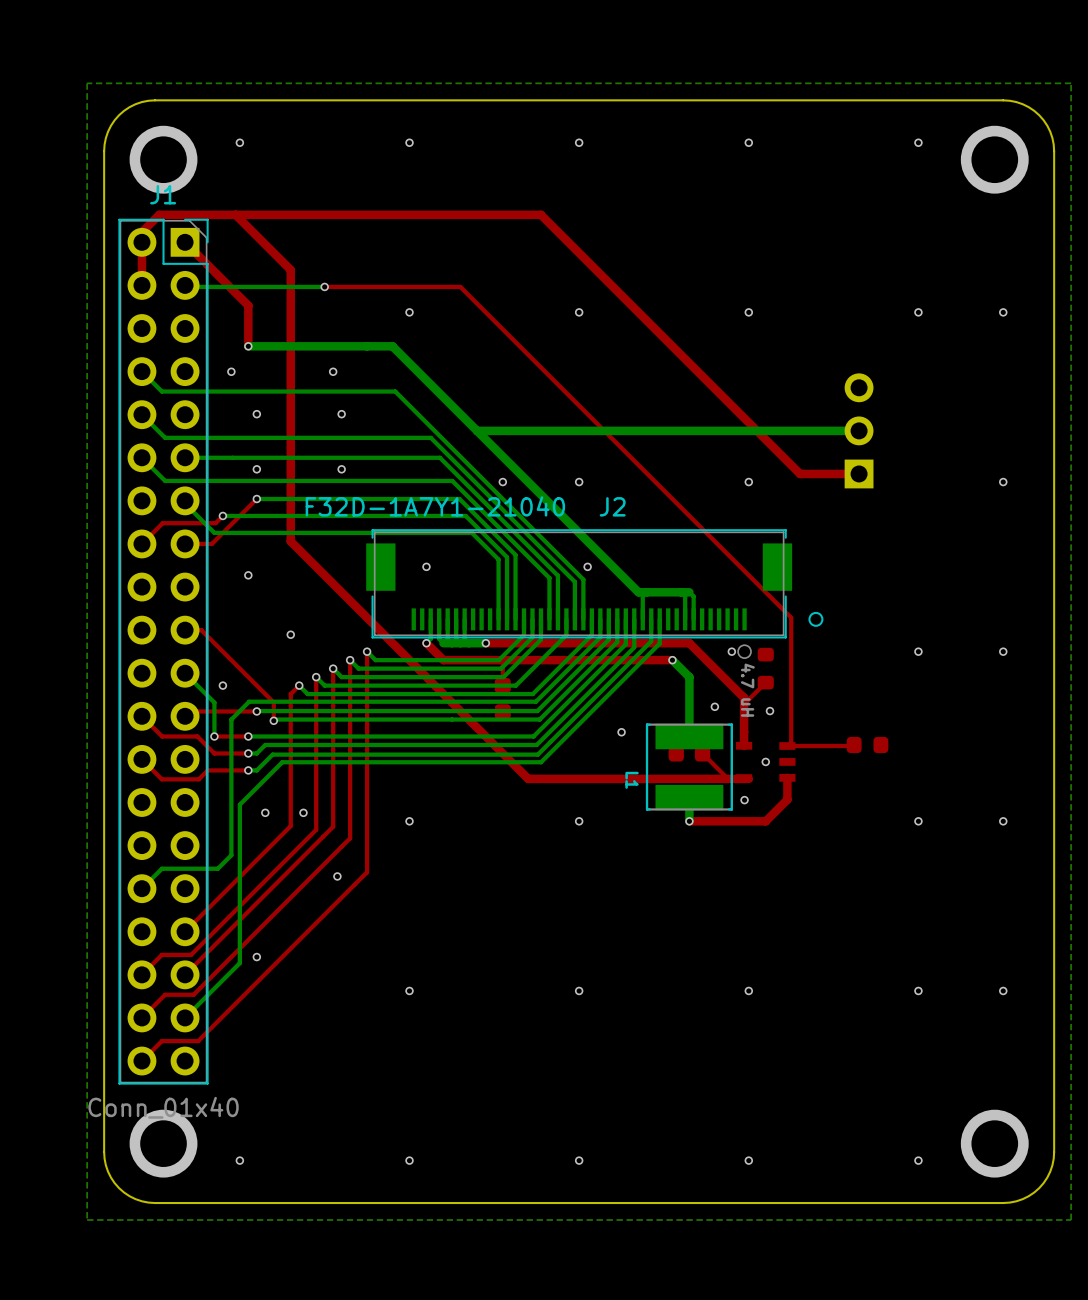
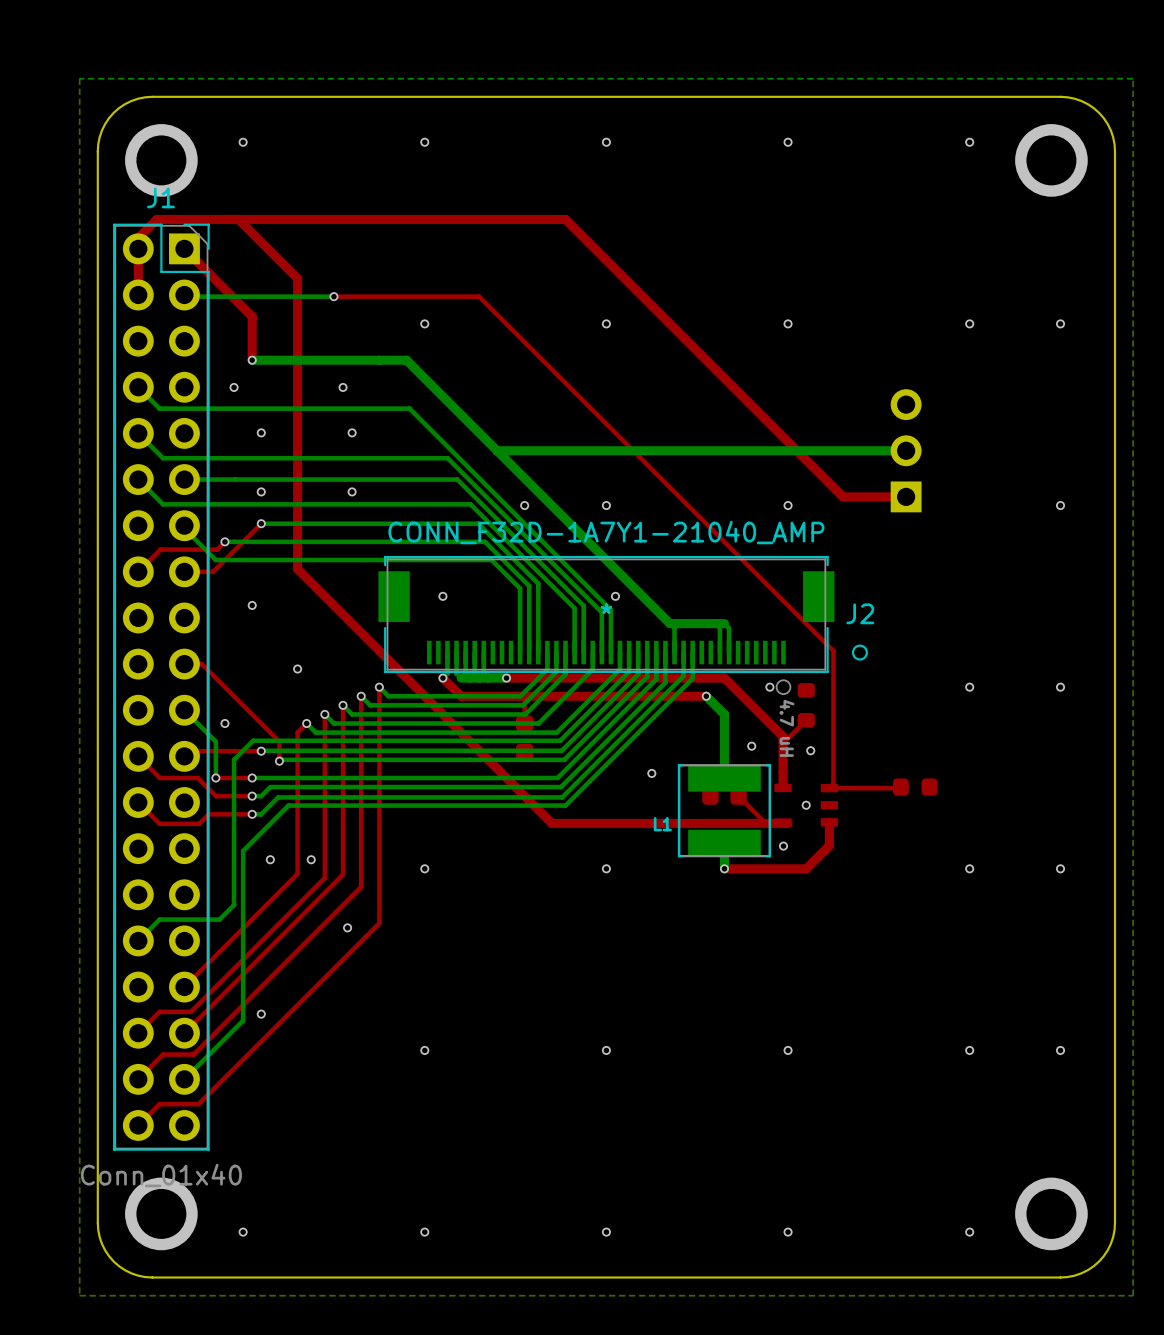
J2 value: F32D-1A7Y1-21040 (435, 506) -> CONN_F32D-1A7Y1-21040_AMP (606, 532)
J2 name position: J2 (612, 506) -> J2 (860, 613)
J2 footprint: [366, 529, 824, 659] -> [378, 555, 868, 696]
L1 name rotation: 0° (632, 780) -> 90° counterclockwise (662, 824)

